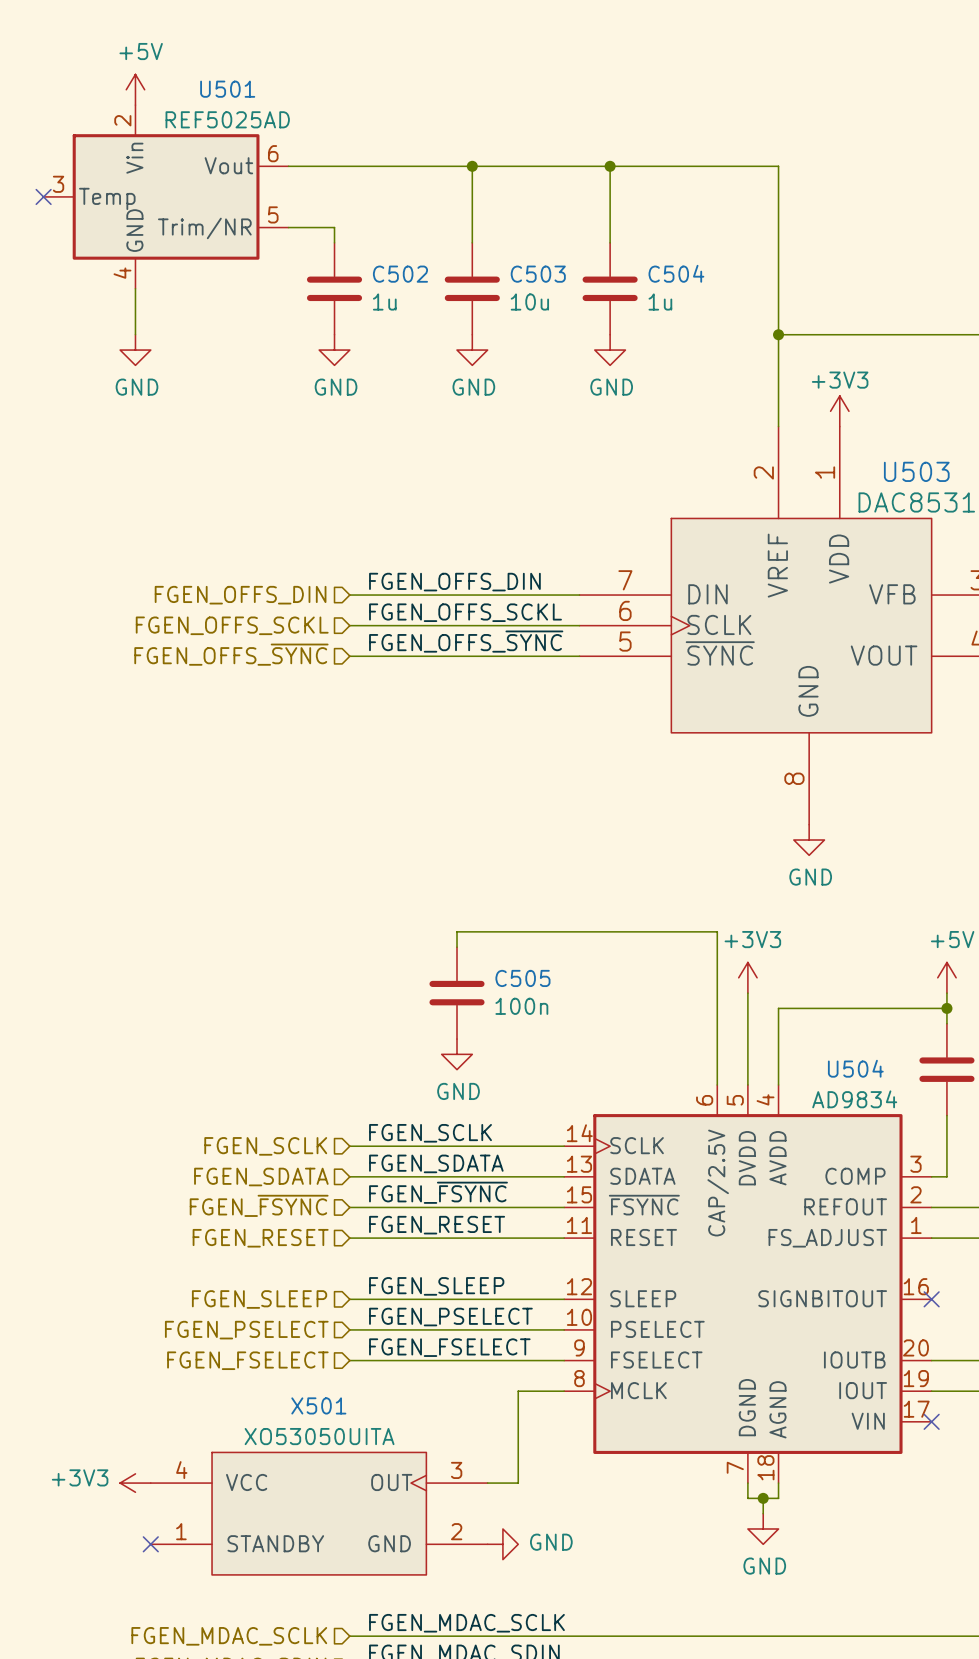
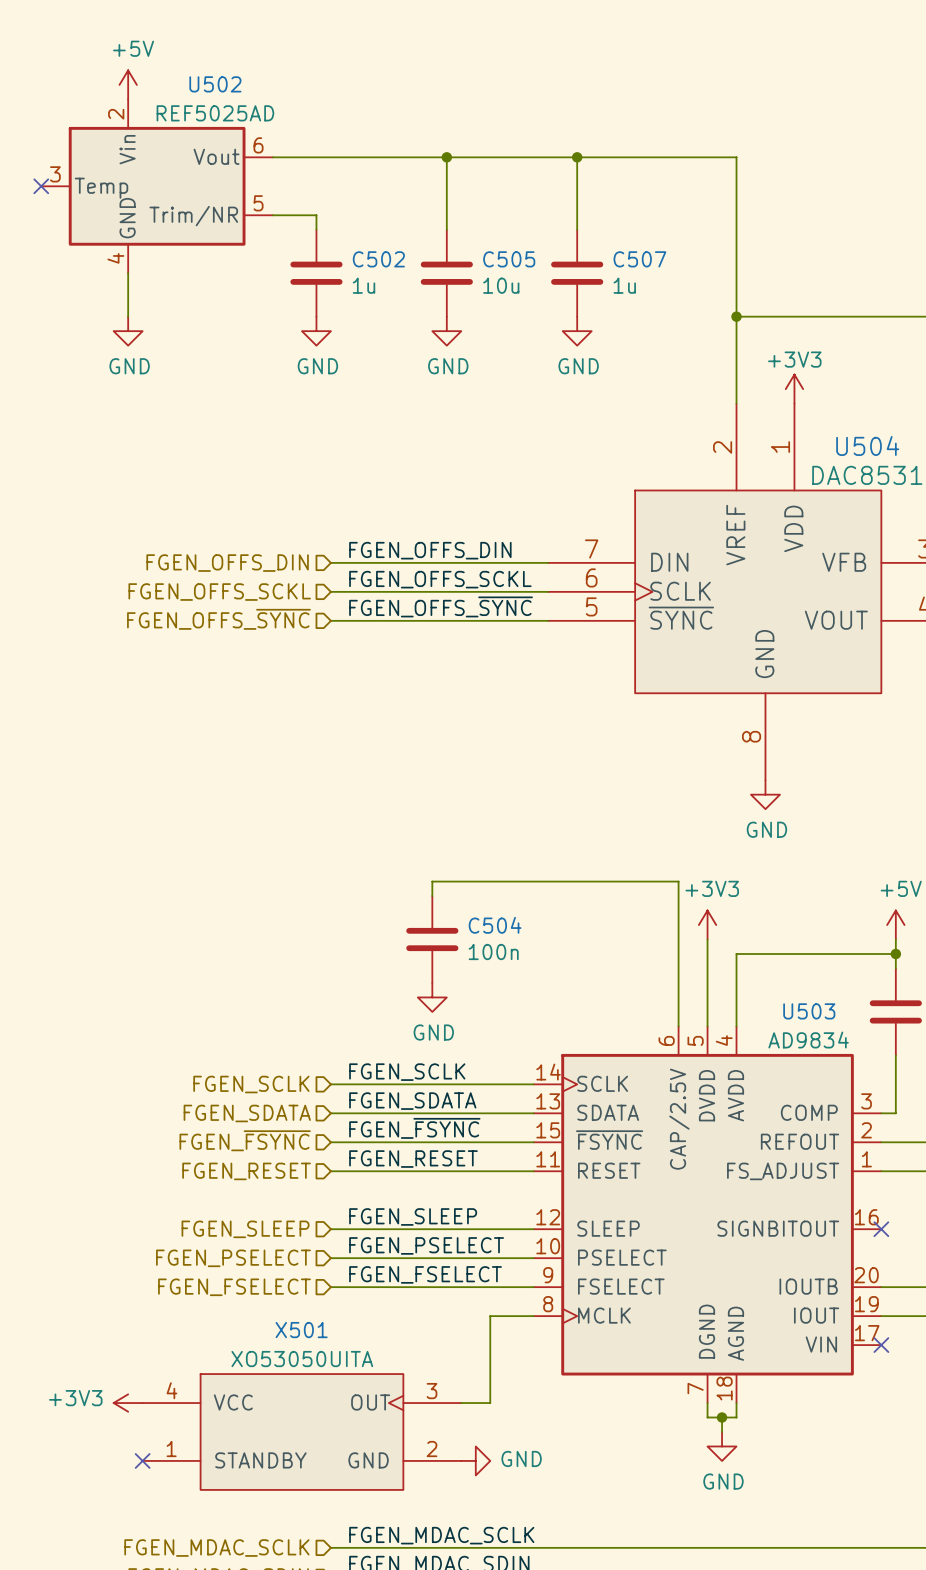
U501 name: U501 (227, 89) -> U502 (215, 84)
C504 name: C504 (676, 273) -> C507 (639, 259)
C503 name: C503 (538, 274) -> C505 (509, 259)
U503 name: U503 (916, 471) -> U504 (867, 445)
C505 name: C505 (522, 978) -> C504 (495, 925)
U504 name: U504 (855, 1068) -> U503 (809, 1011)

